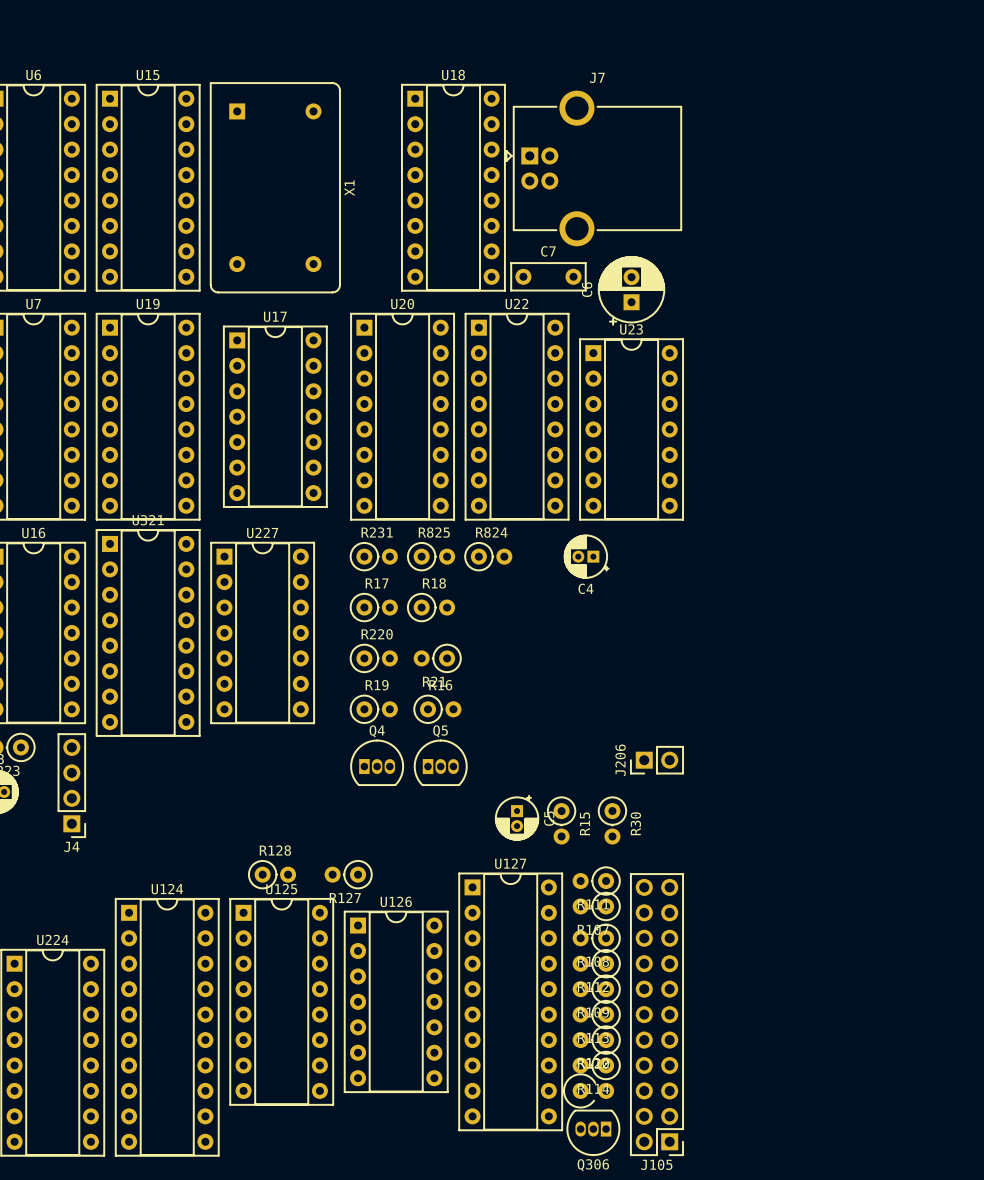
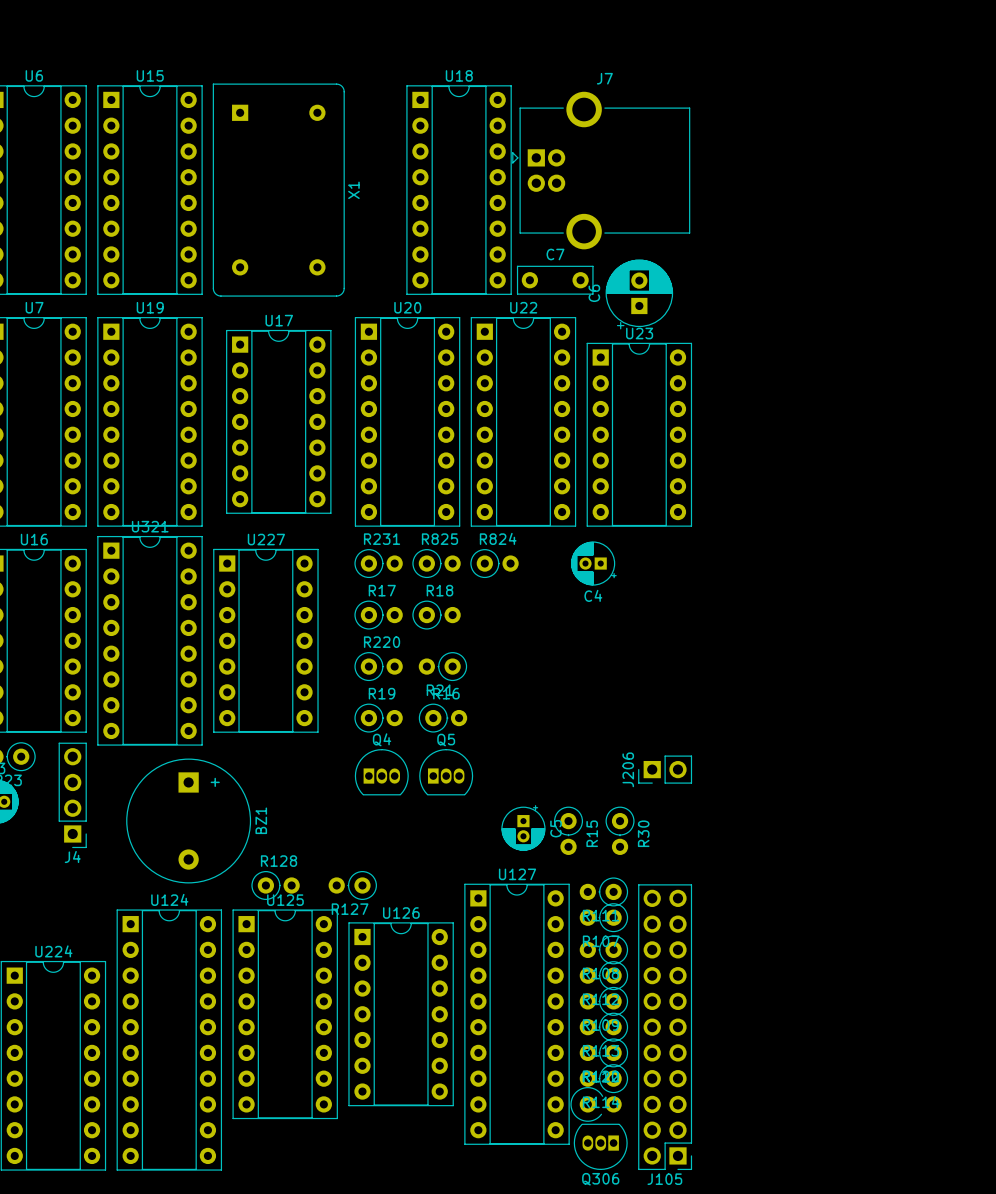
BZ1: none -> (188, 821)

